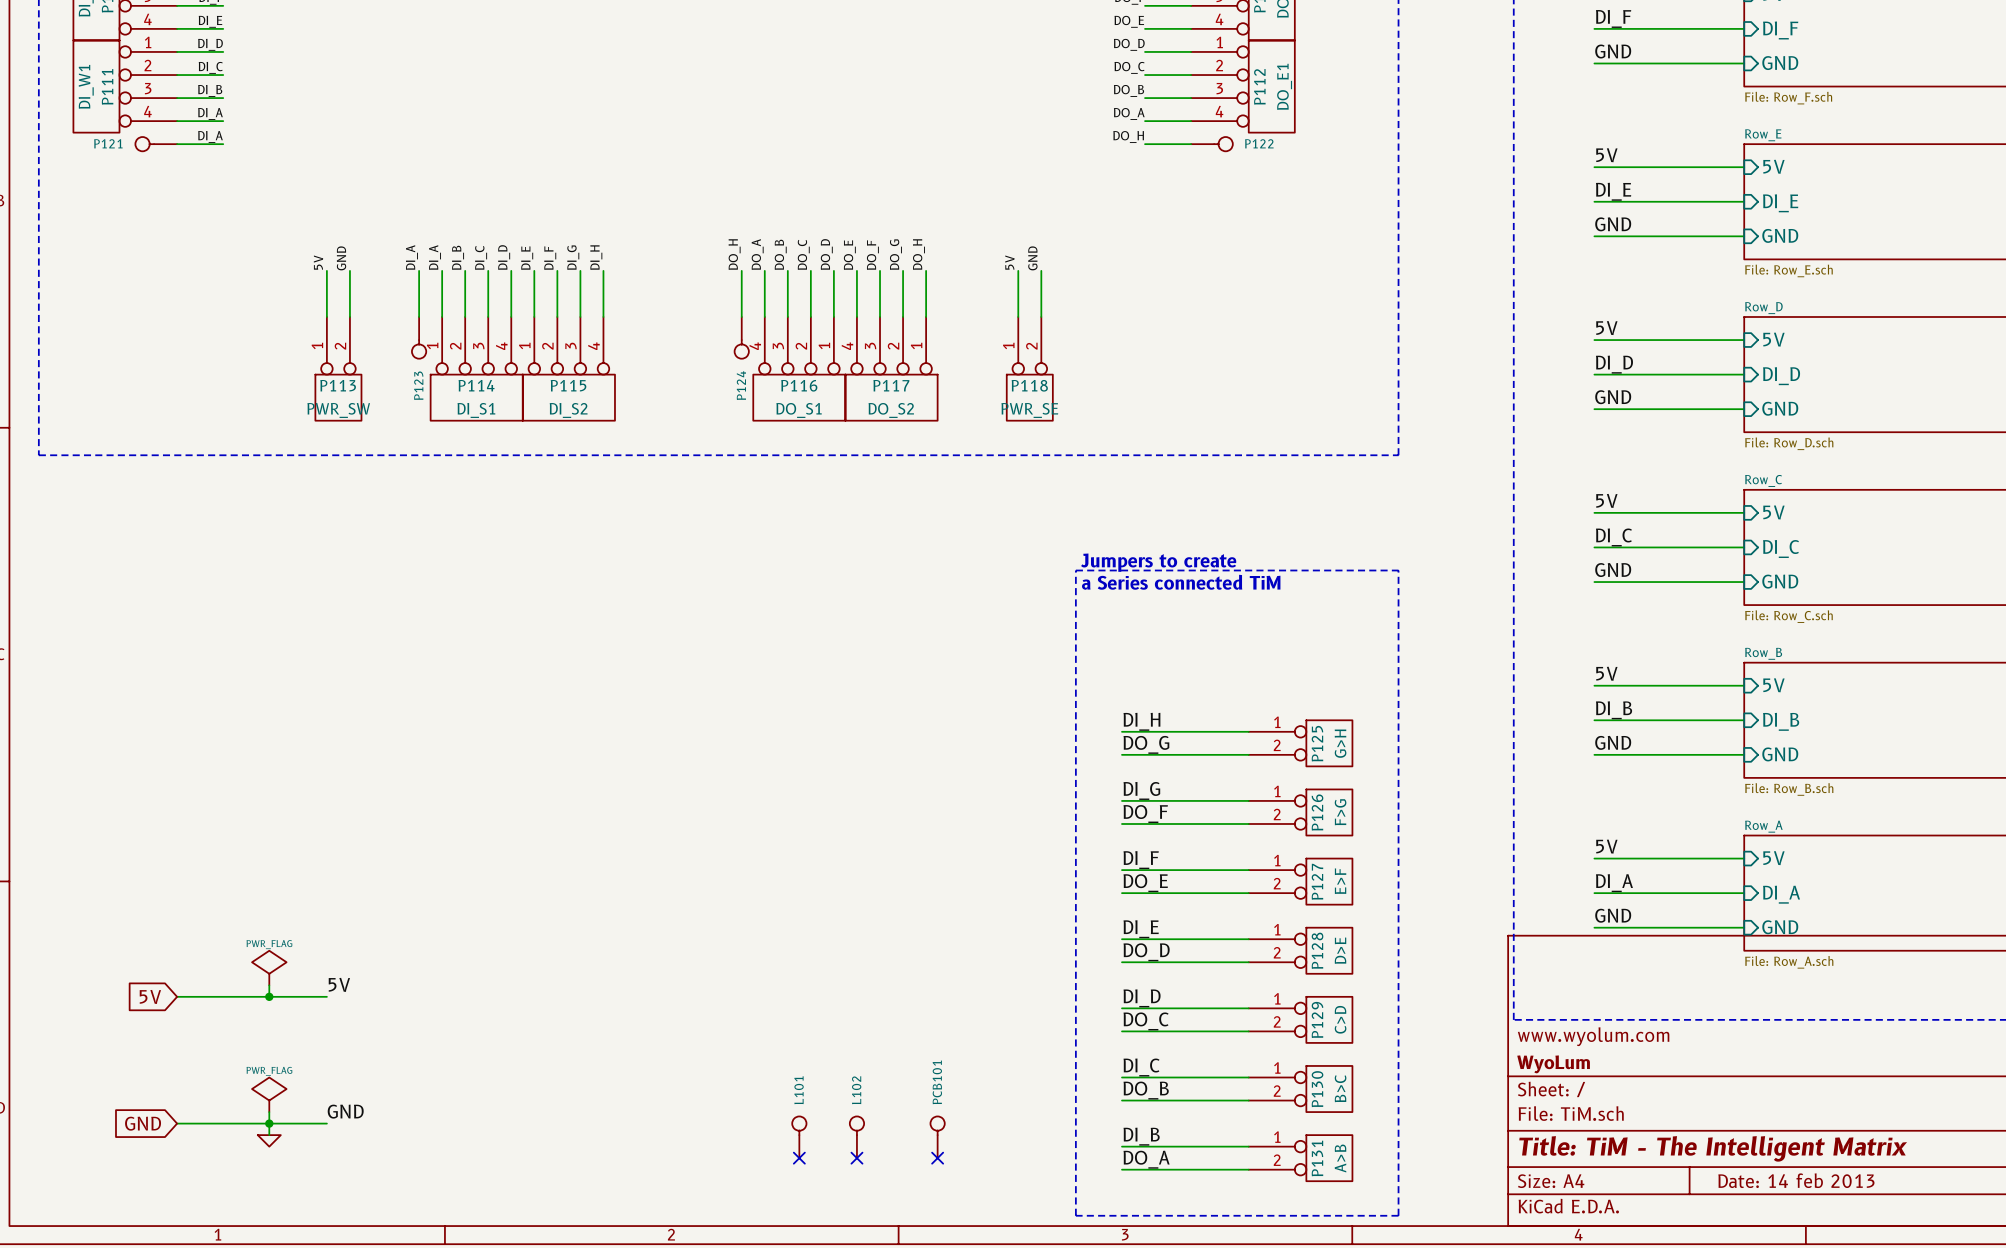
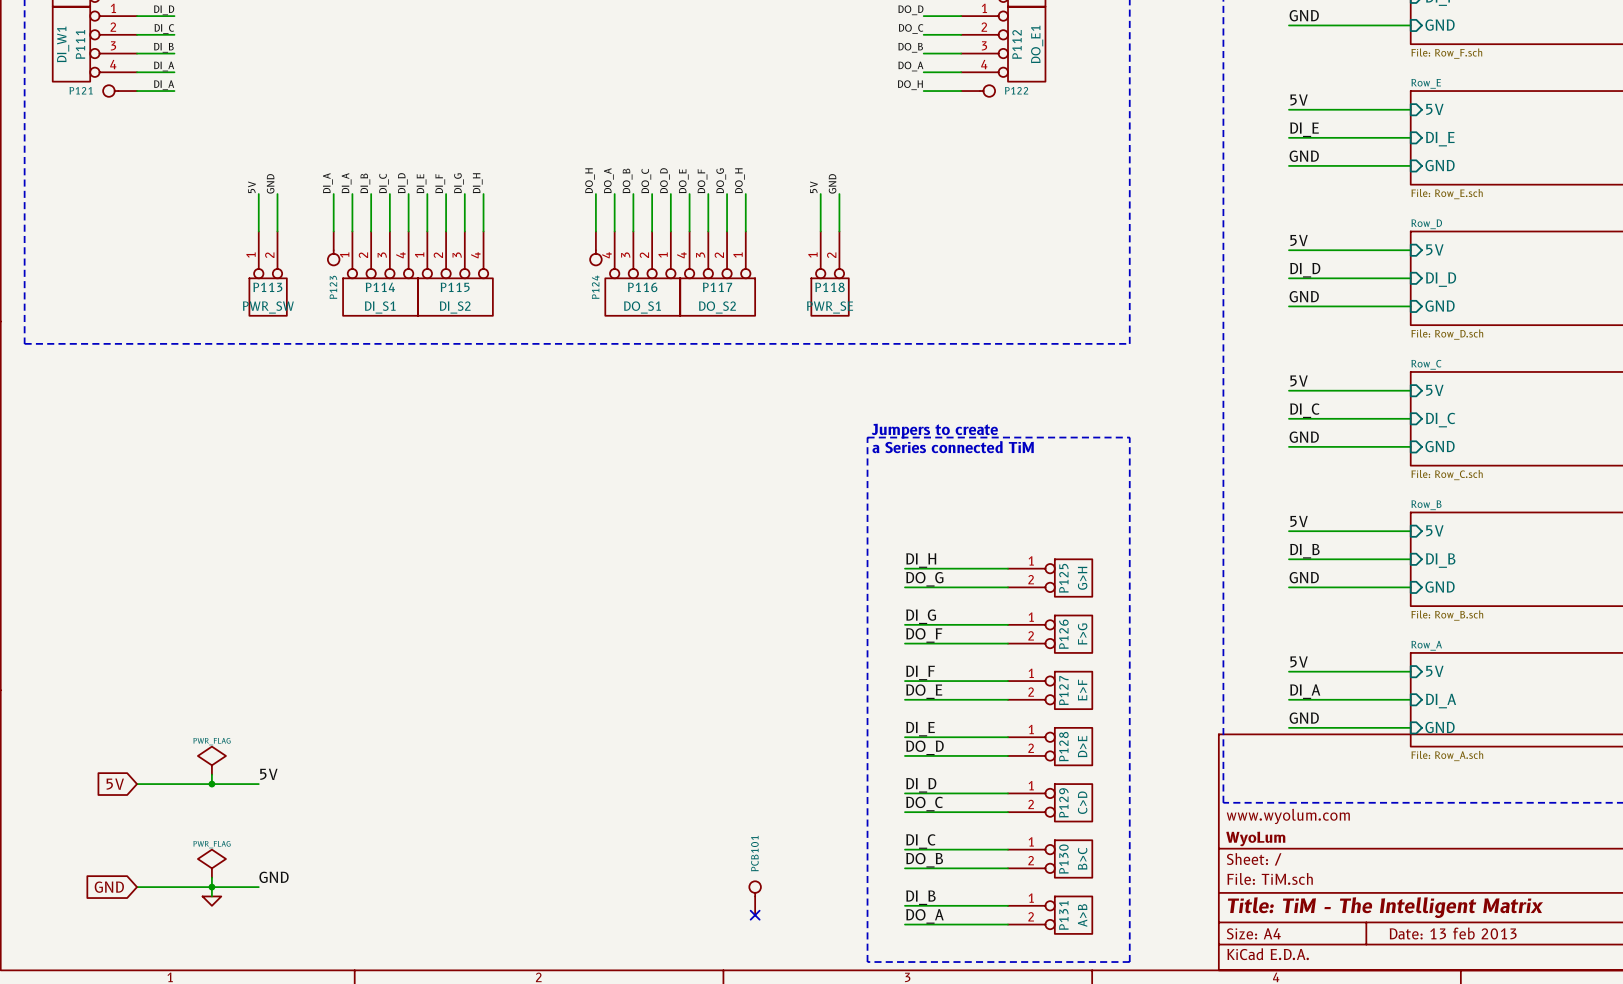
L101: (799, 1137) -> none
L102: (856, 1137) -> none
no-connect mark: (799, 1158) -> none
no-connect mark: (856, 1158) -> none
title block: Date: 14 feb 2013 (1796, 1180) -> Date: 13 feb 2013 (1453, 933)

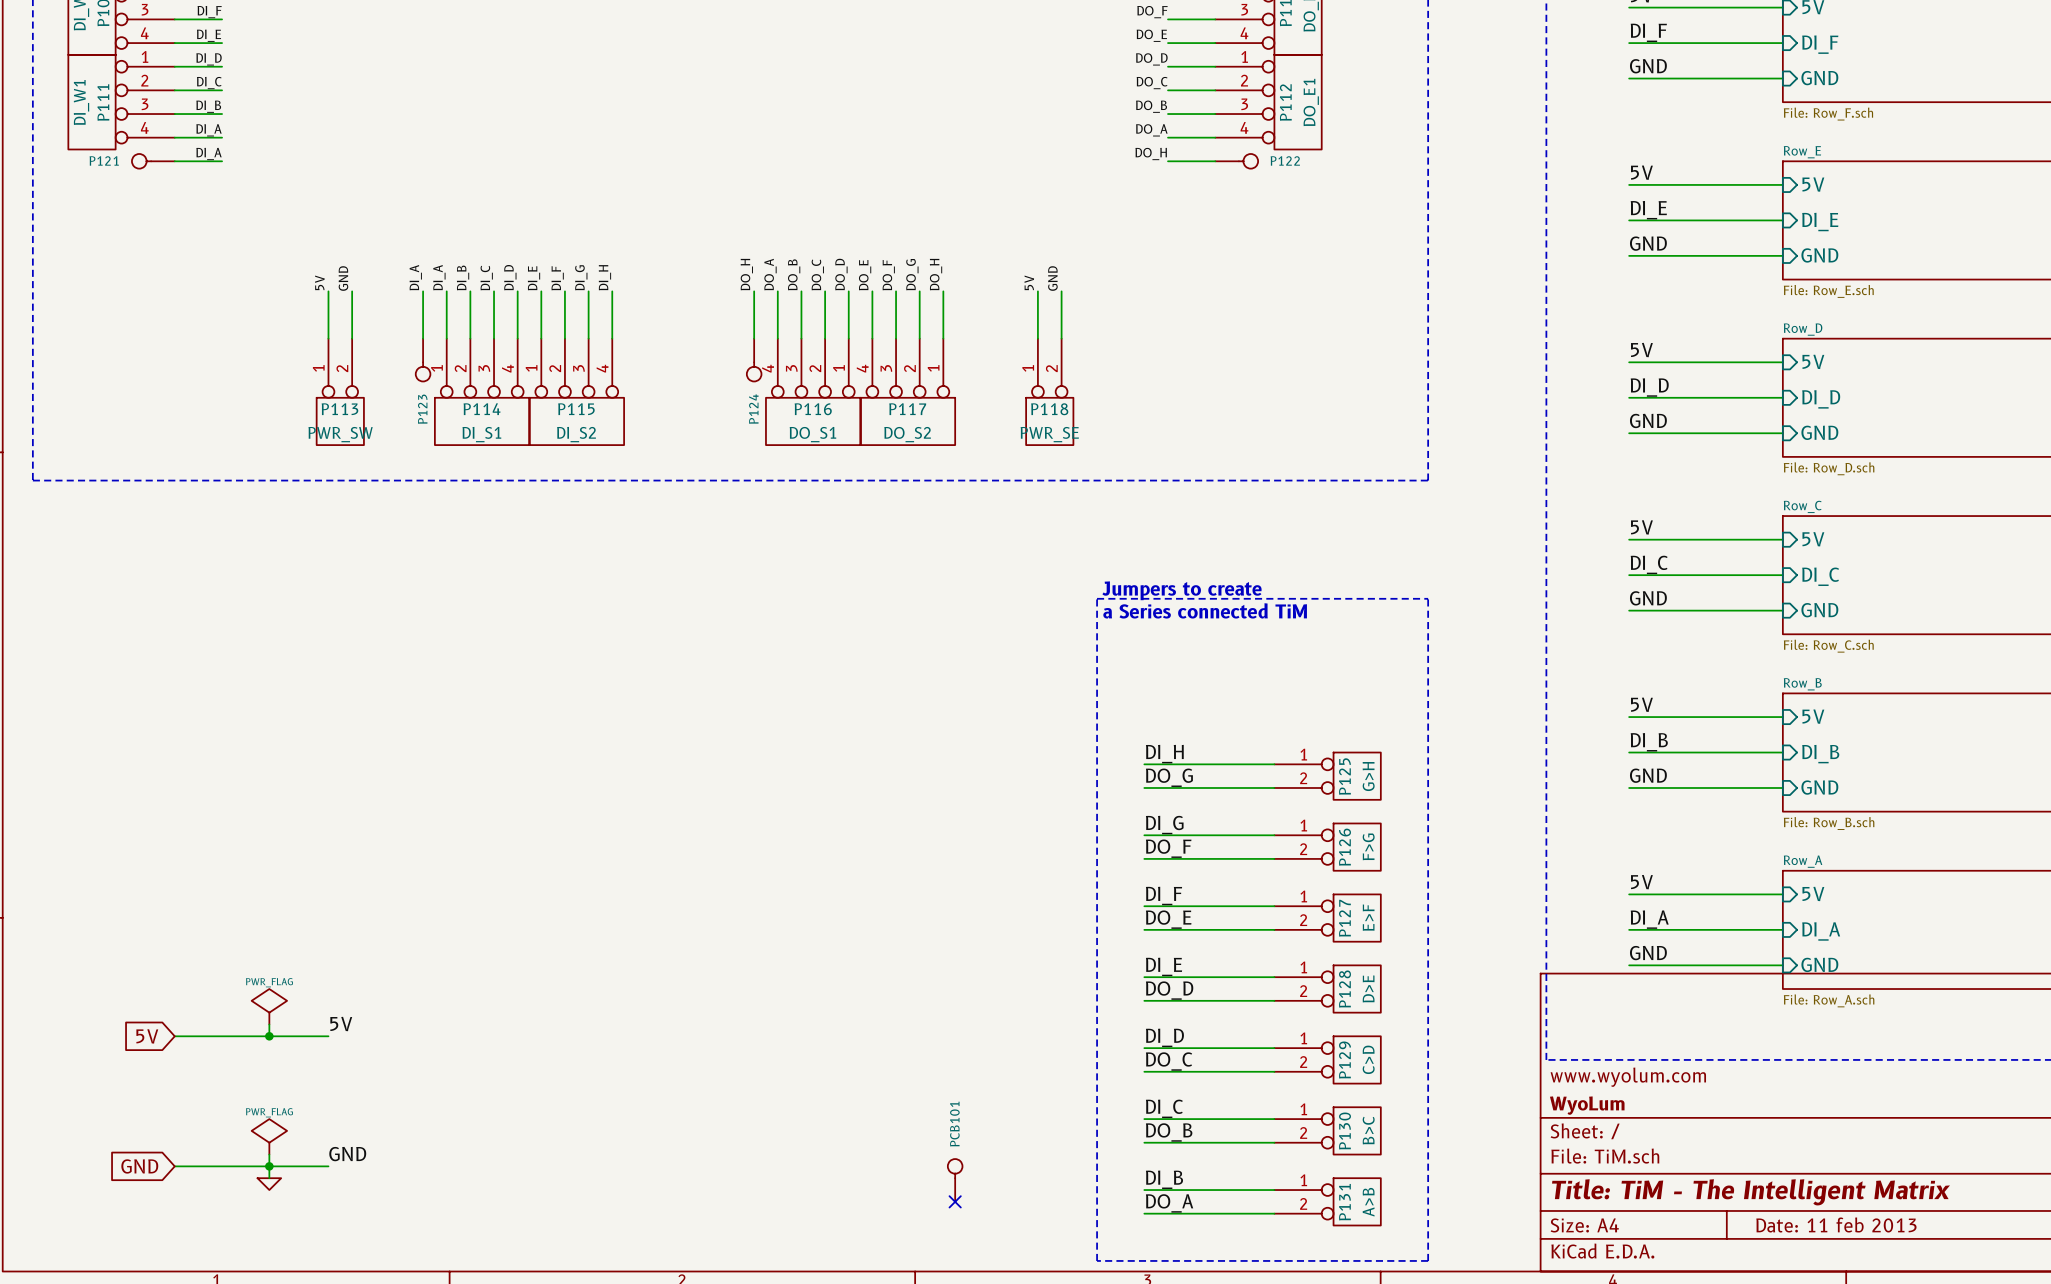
title block: Date: 13 feb 2013 (1453, 933) -> Date: 11 feb 2013 (1836, 1224)

